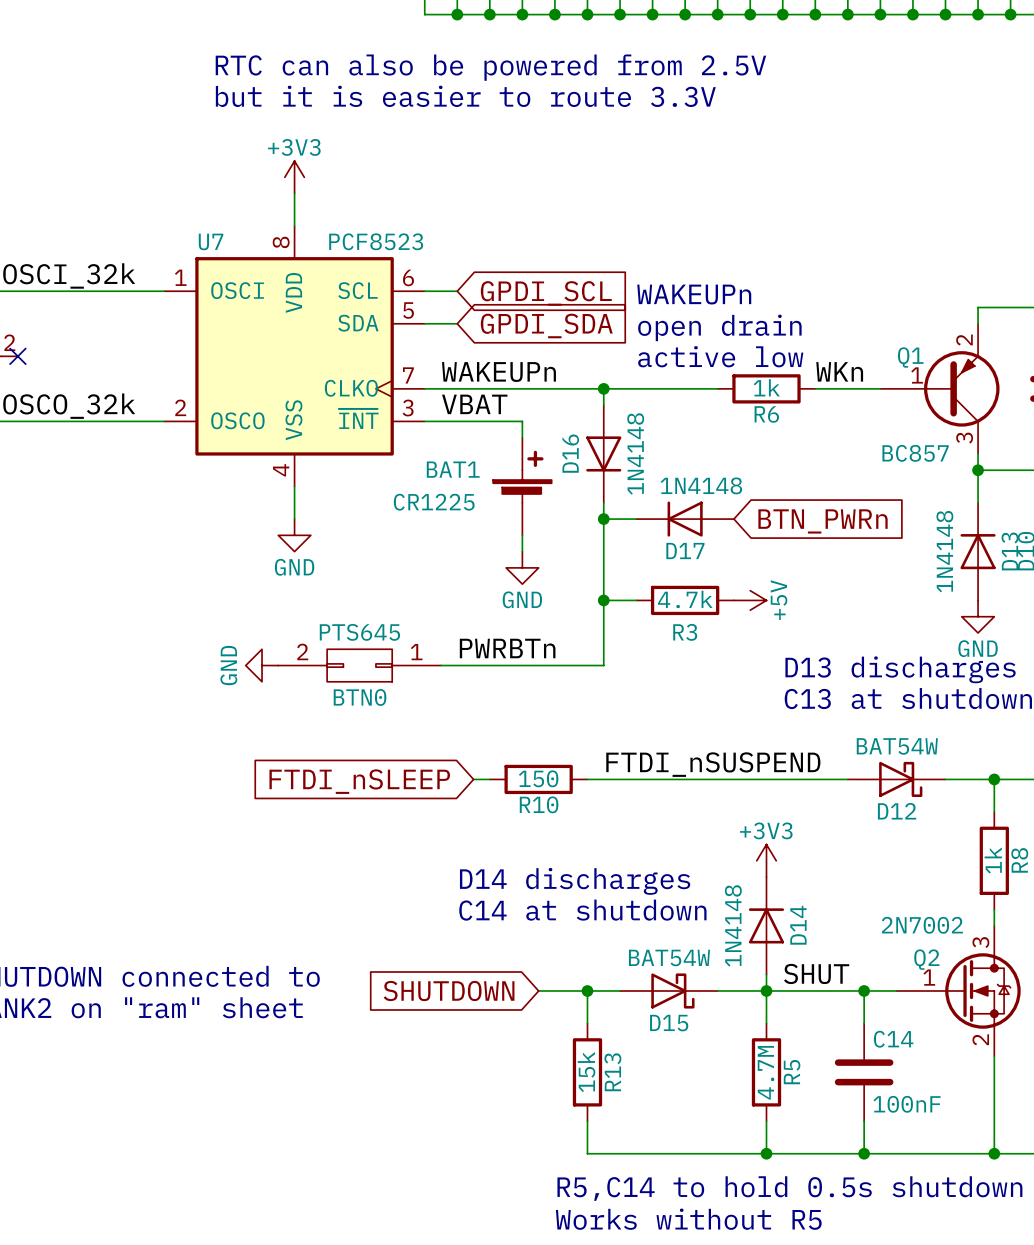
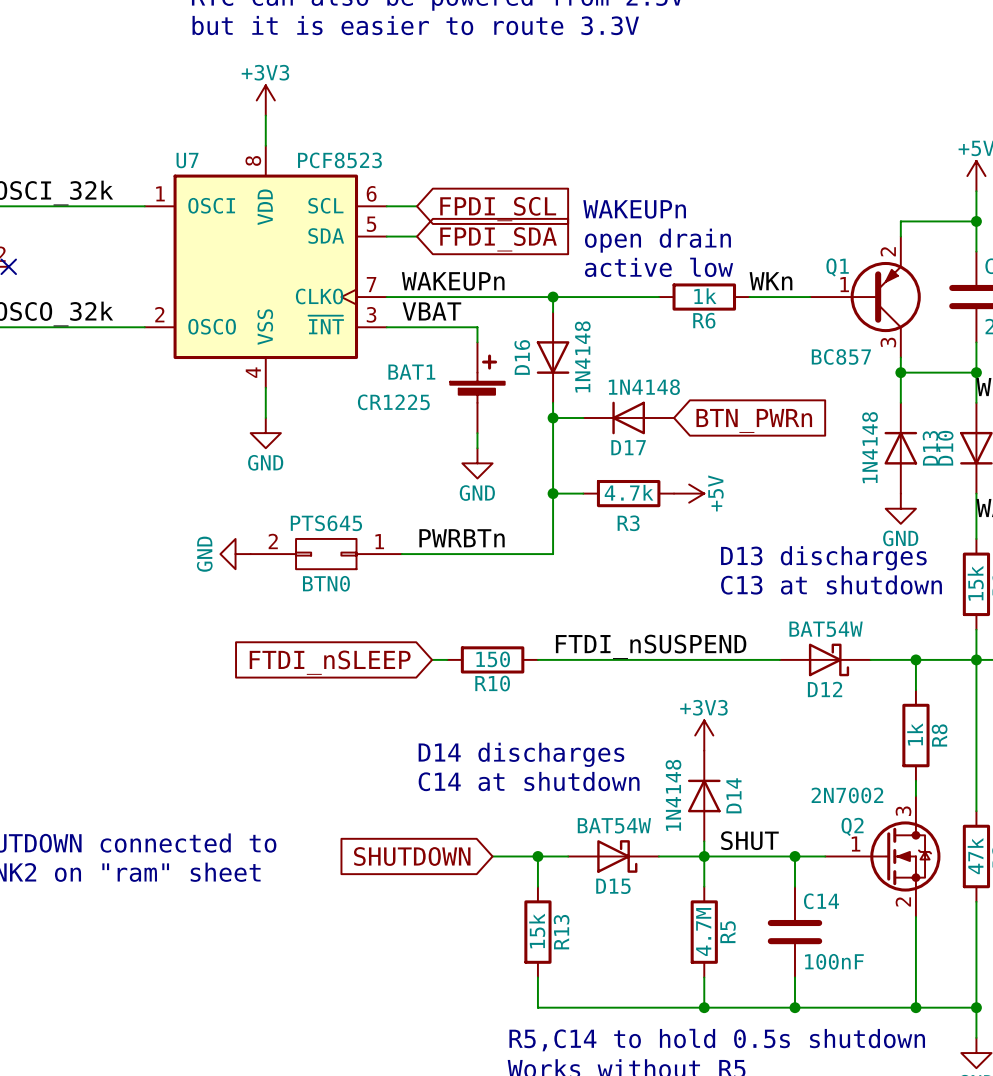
global label: GPDI_SCL (546, 293) -> FPDI_SCL (498, 209)
global label: GPDI_SDA (546, 325) -> FPDI_SDA (498, 239)

